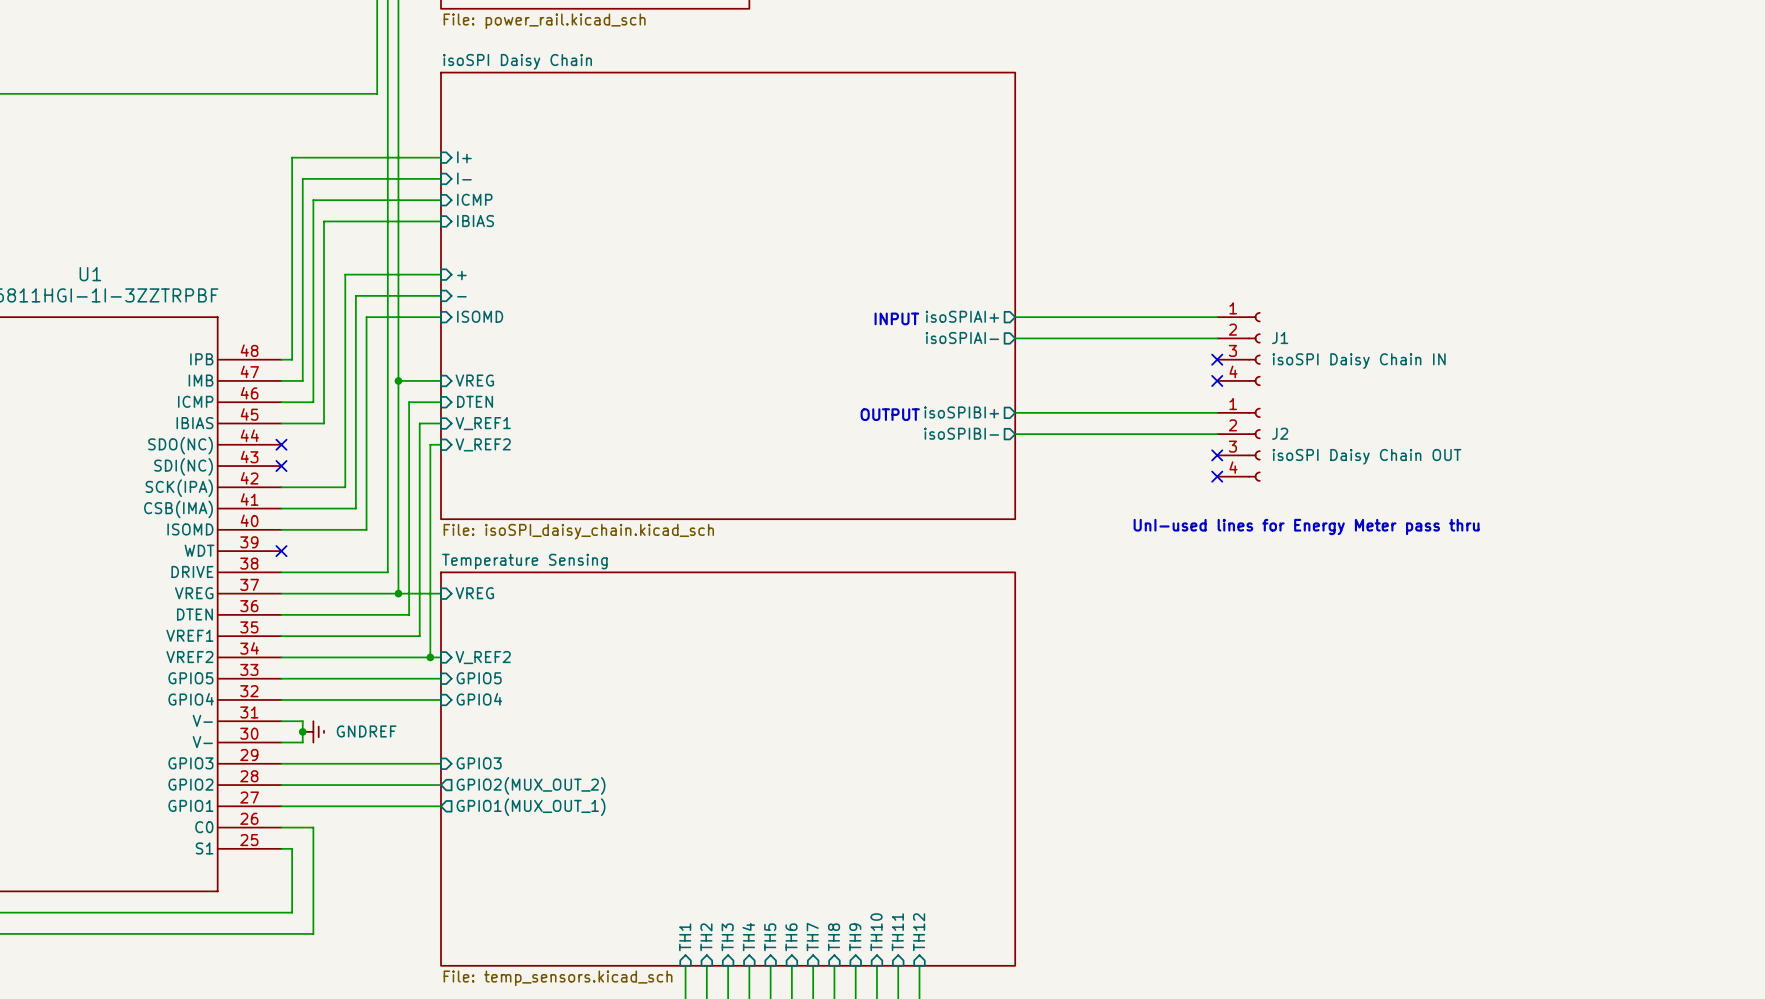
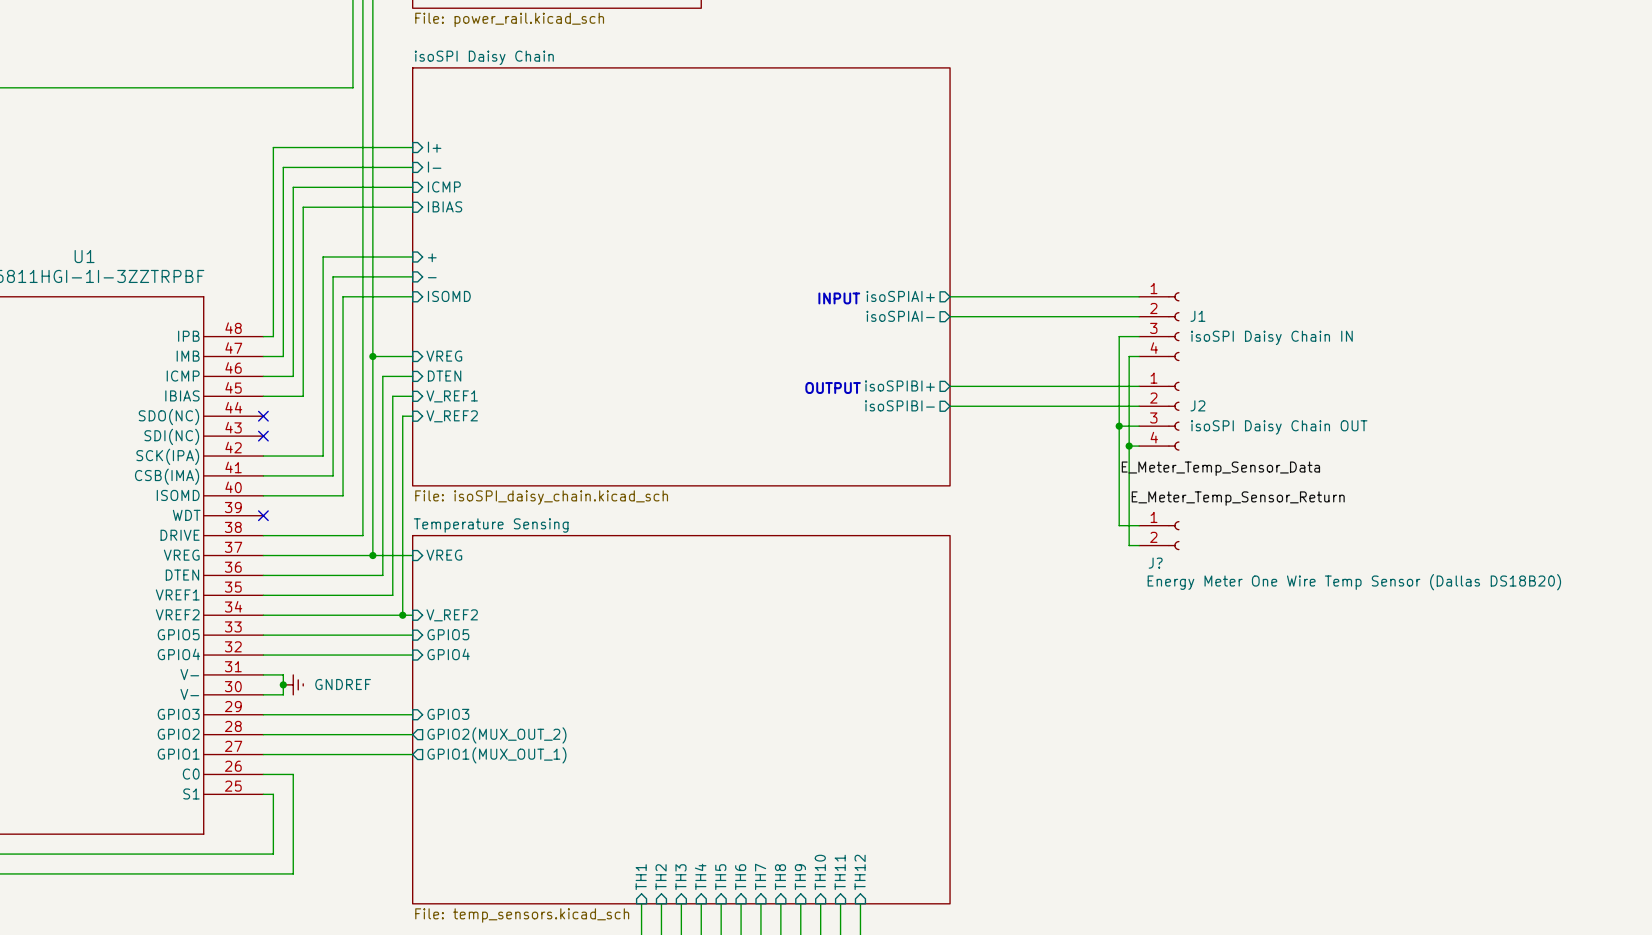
wire: none -> (1139, 336) (1119, 336) (1119, 525) (1139, 525)
no-connect mark: (1217, 359) -> none
wire: none -> (1139, 356) (1129, 356) (1129, 545) (1139, 545)
no-connect mark: (1217, 380) -> none
wire: none -> (1119, 426) (1139, 426)
junction: none -> (1119, 426)
no-connect mark: (1217, 455) -> none
wire: none -> (1129, 446) (1139, 446)
junction: none -> (1129, 446)
no-connect mark: (1217, 476) -> none
label: none -> E_Meter_Temp_Sensor_Data (1220, 468)
text: UnI-used lines for Energy Meter pass thru (1306, 526) -> none
label: none -> E_Meter_Temp_Sensor_Return (1238, 498)
J?: none -> Energy Meter One Wire Temp Sensor (Dallas DS18B20) (1159, 535)

